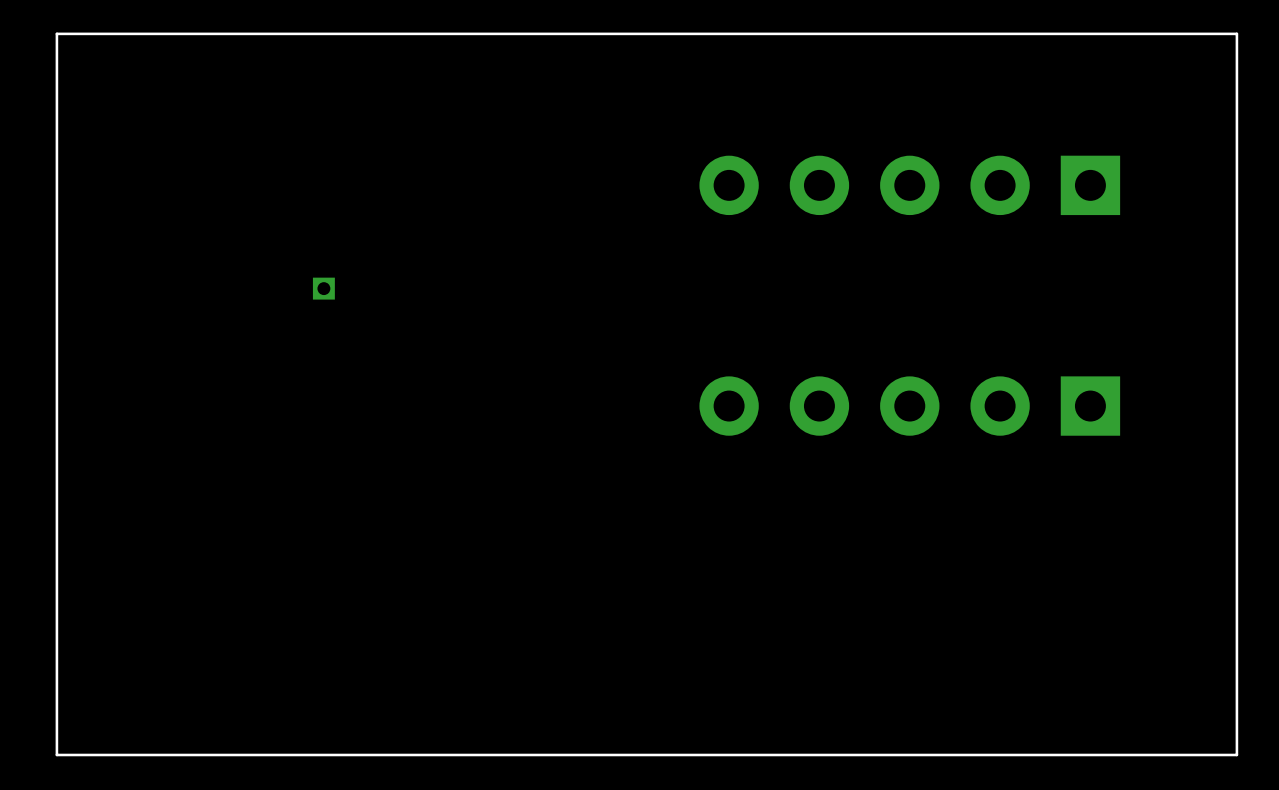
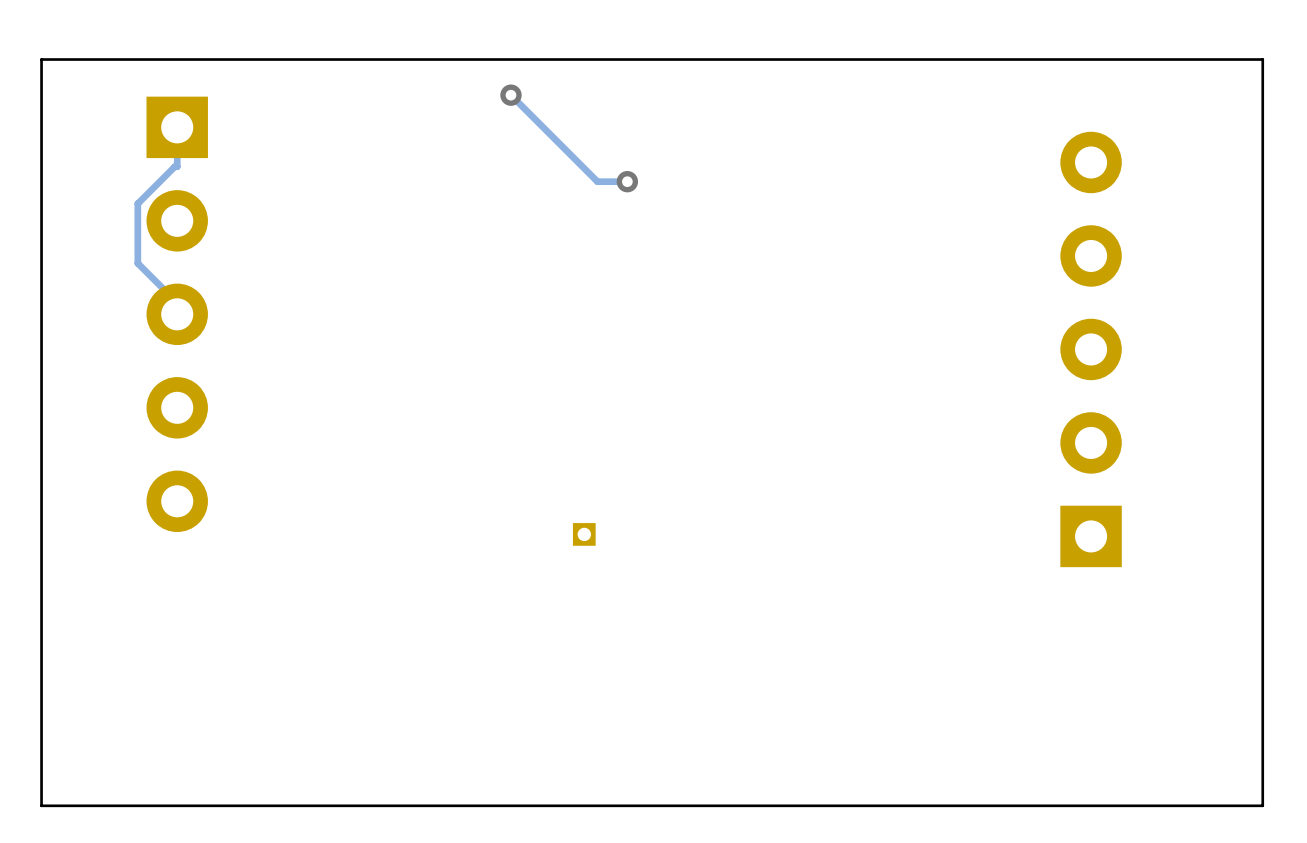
track: none -> (510, 95) (597, 181) (627, 181)
via: none -> (510, 95)
track: none -> (177, 127) (177, 166) (174, 166) (137, 203) (137, 263) (177, 302) (177, 314)
via: none -> (627, 181)
part: (909, 185) -> none
part: none -> (177, 314)
part position: (323, 288) -> (584, 534)
part: none -> (1091, 349)
part: (909, 406) -> none

